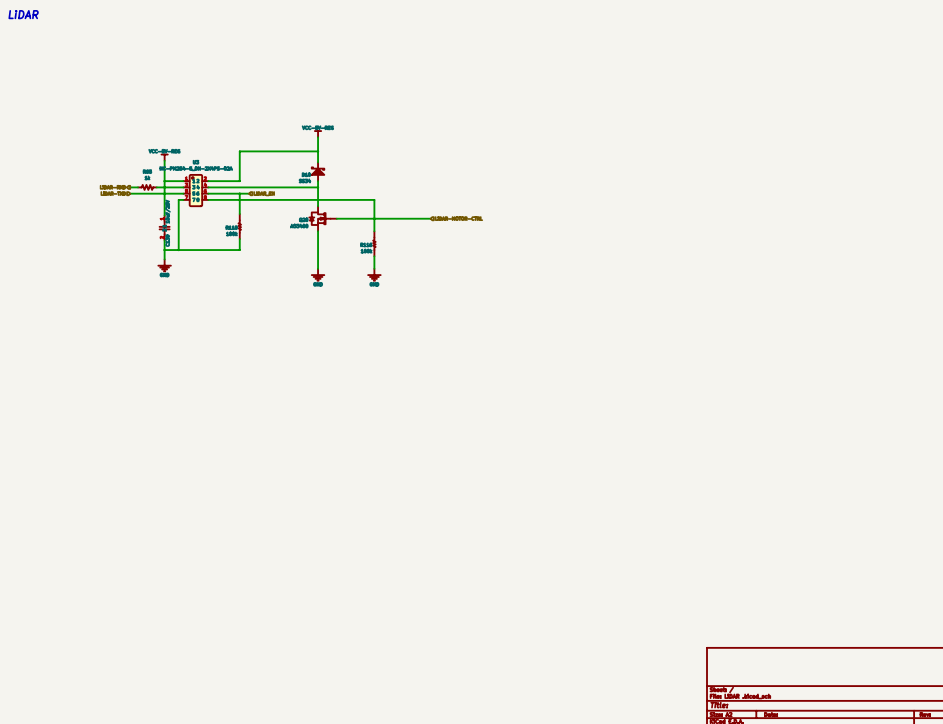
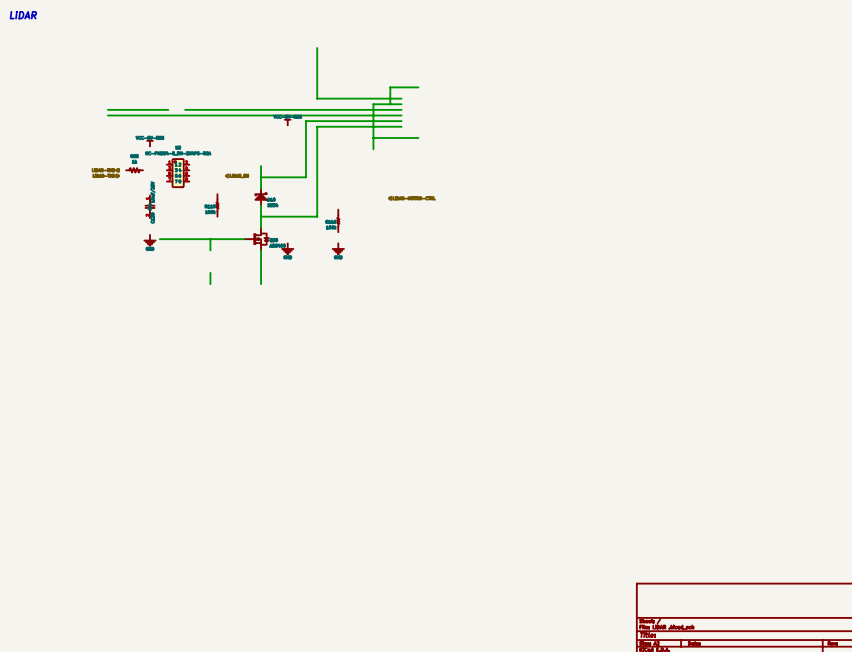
wire: none -> (317, 48) (317, 98) (401, 98)
wire: none -> (418, 87) (390, 87) (390, 104)
wire: none -> (401, 104) (373, 104) (373, 149)
wire: none -> (107, 109) (168, 109)
wire: none -> (185, 109) (401, 109)
wire: none -> (107, 115) (401, 115)
wire: none -> (401, 121) (305, 121) (305, 177) (261, 177)
wire: (318, 137) (318, 162) -> (261, 166) (261, 188)
wire: none -> (401, 126) (317, 126) (317, 216) (261, 216)
wire: (318, 151) (239, 151) (239, 181) (208, 181) -> none
wire: none -> (373, 137) (418, 137)
wire: (164, 160) (164, 215) -> none
part flip: as is (318, 171) -> left-right (261, 196)
part position: (318, 171) -> (261, 197)
wire: (164, 181) (183, 181) -> none
wire: (318, 181) (318, 206) -> (261, 205) (261, 227)
wire: (130, 187) (138, 187) -> none
wire: (156, 187) (183, 187) -> none
wire: (208, 187) (318, 187) -> none
wire: (130, 193) (183, 193) -> none
wire: (208, 193) (249, 193) -> none
wire: (239, 193) (239, 214) -> none
wire: (183, 199) (178, 199) (178, 250) -> none
wire: (208, 199) (374, 199) (374, 231) -> none
part flip: as is (319, 218) -> left-right (259, 239)
part position: (323, 218) -> (256, 239)
wire: (336, 218) (430, 218) -> none
wire: (318, 231) (318, 268) -> (261, 250) (261, 284)
wire: (239, 239) (239, 250) (164, 250) -> none
wire: (164, 240) (164, 259) -> none
wire: (374, 256) (374, 268) -> none
wire: none -> (159, 239) (244, 239)
wire: none -> (210, 239) (210, 250)
wire: none -> (210, 272) (210, 284)

